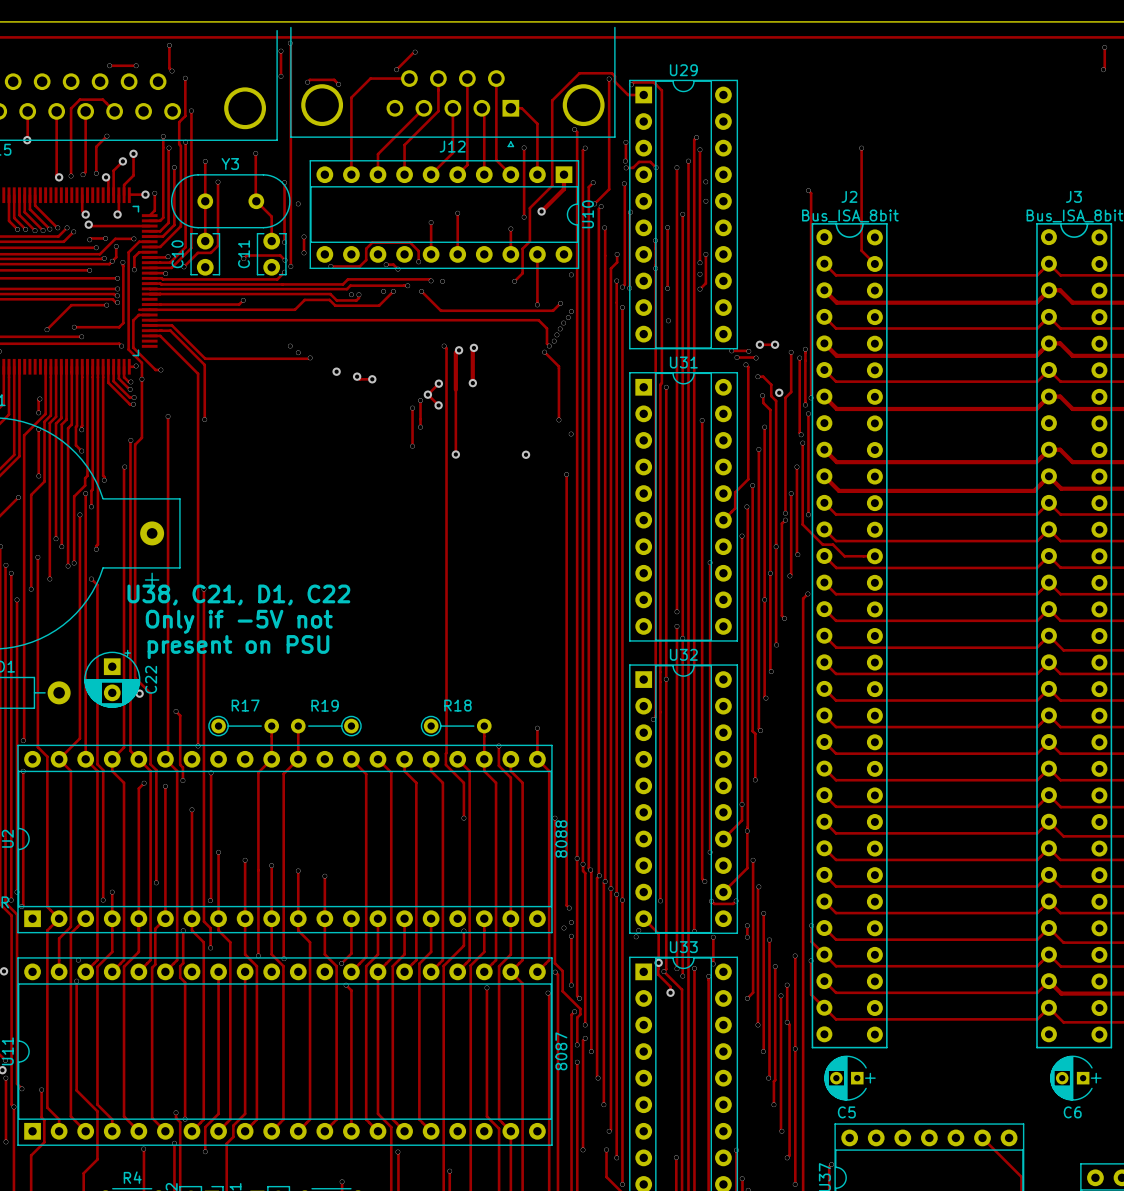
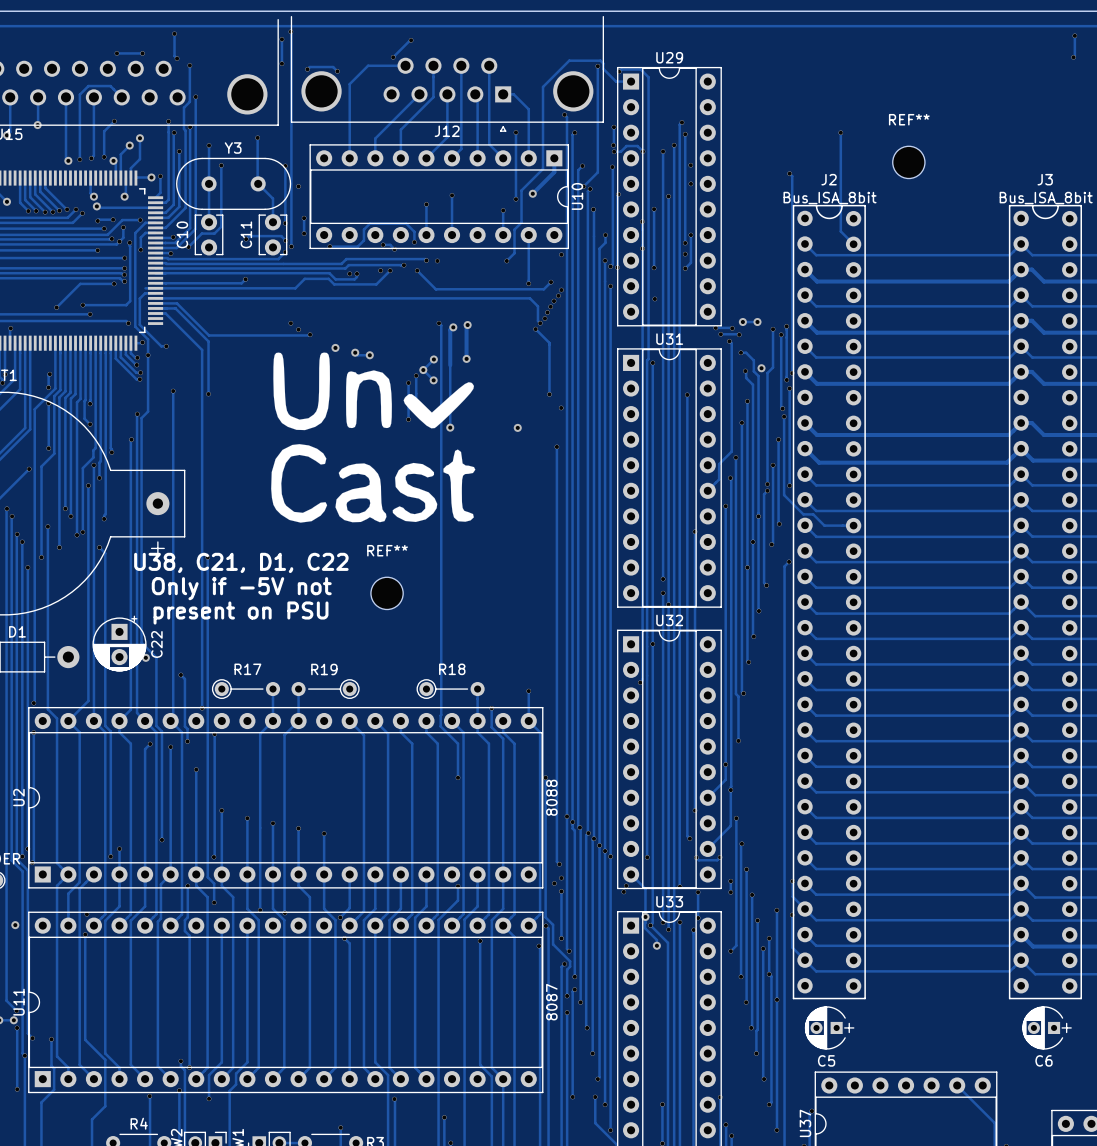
REF**: none -> (908, 162)
drawing: none -> [271, 352, 476, 523]
REF**: none -> (387, 593)

